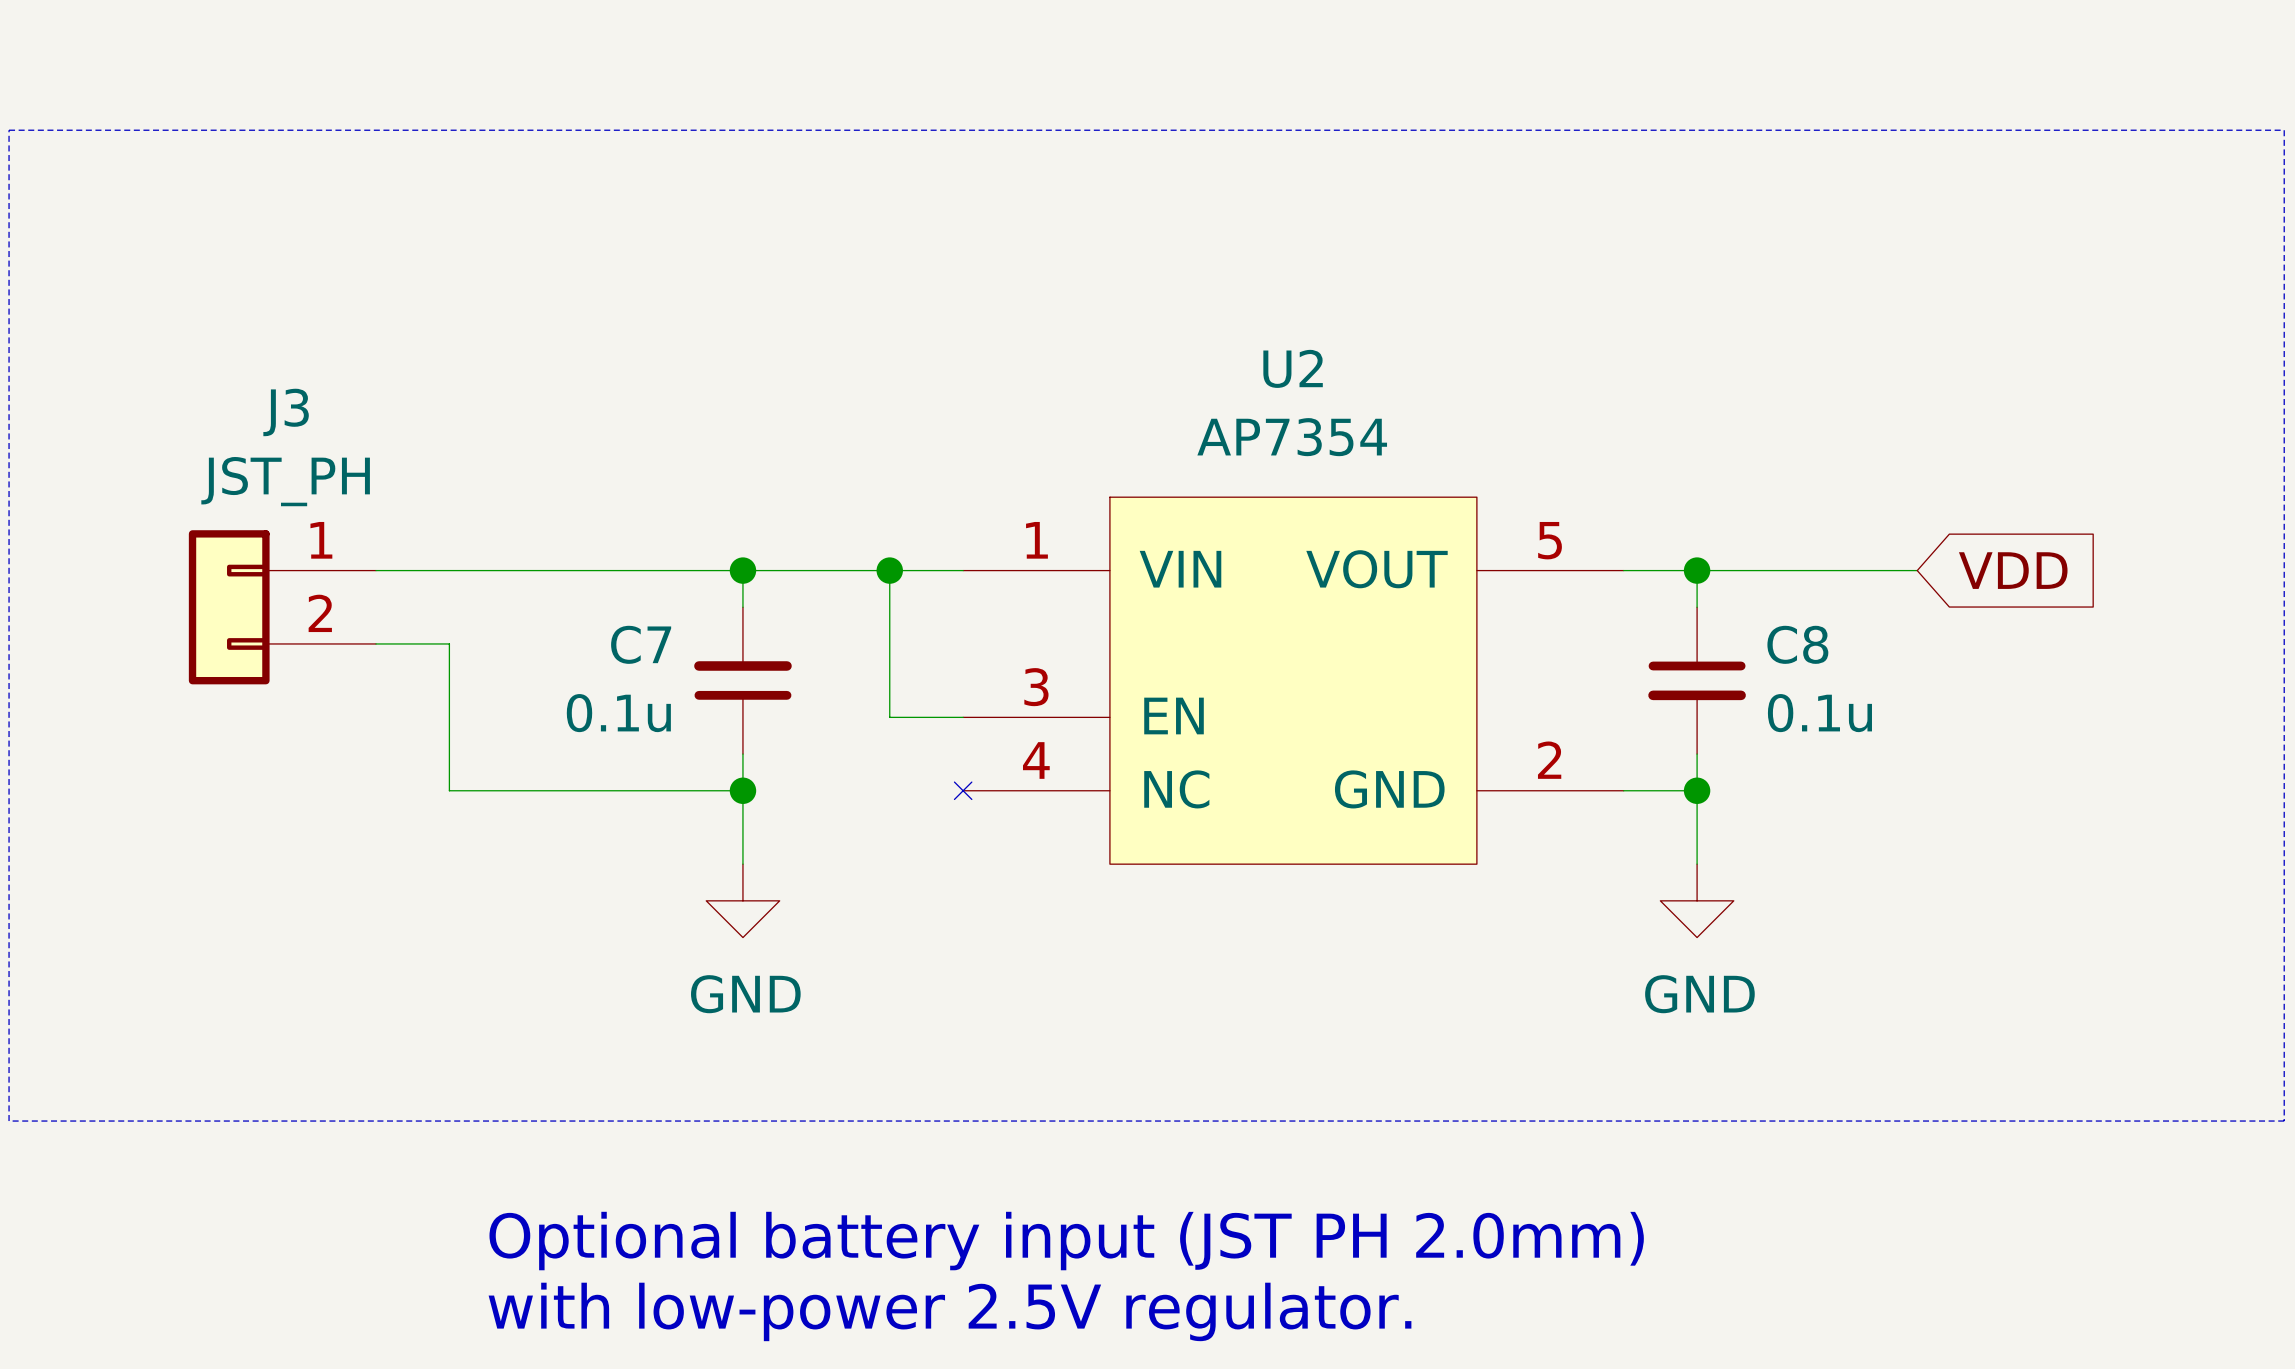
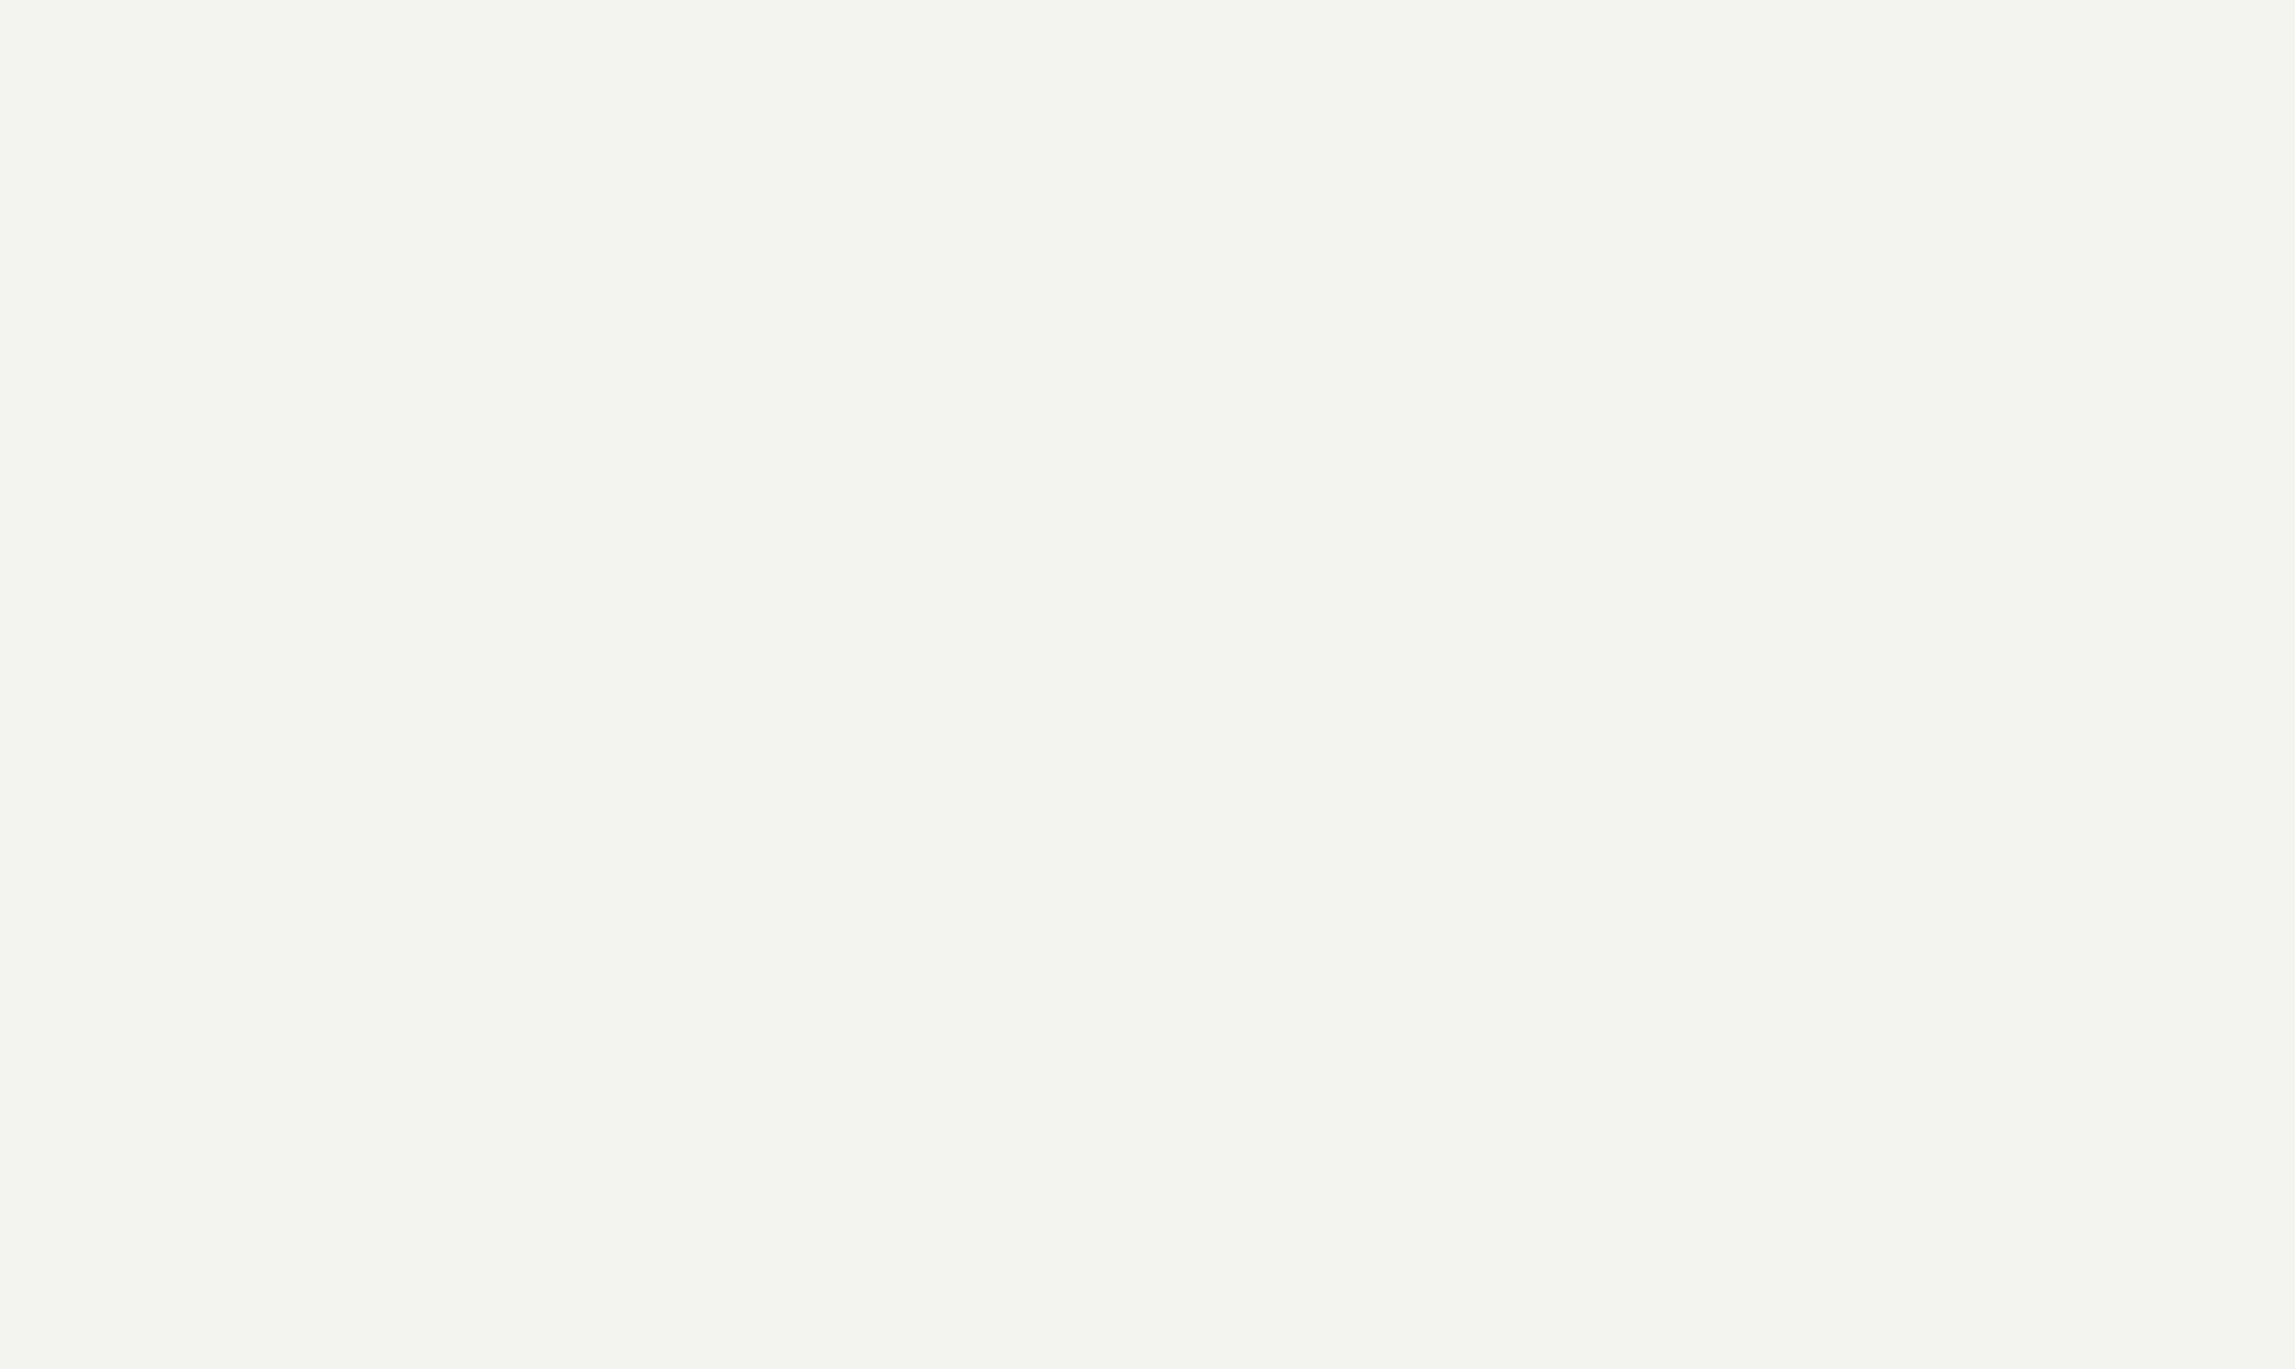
line: (9, 130) (2284, 130) (2284, 1121) (9, 1121) (9, 130) -> none
wire: (376, 570) (963, 570) -> none
wire: (742, 570) (742, 607) -> none
junction: (742, 570) -> none
wire: (889, 570) (889, 717) (963, 717) -> none
junction: (889, 570) -> none
wire: (1623, 570) (1917, 570) -> none
wire: (1697, 570) (1697, 607) -> none
junction: (1697, 570) -> none
global label: VDD (2013, 570) -> none
J3: JST_PH (282, 607) -> none
wire: (376, 643) (449, 643) (449, 790) (742, 790) -> none
C7: 0.1u (742, 680) -> none
U2: AP7354 (1289, 680) -> none
C8: 0.1u (1697, 680) -> none
wire: (742, 754) (742, 864) -> none
wire: (1697, 754) (1697, 864) -> none
junction: (742, 790) -> none
wire: (1623, 790) (1697, 790) -> none
junction: (1697, 790) -> none
power symbol: GND (742, 900) -> none
power symbol: GND (1697, 900) -> none
text: Optional battery input (JST PH 2.0mm) (1066, 1241) -> none
text: with low-power 2.5V regulator. (950, 1311) -> none

